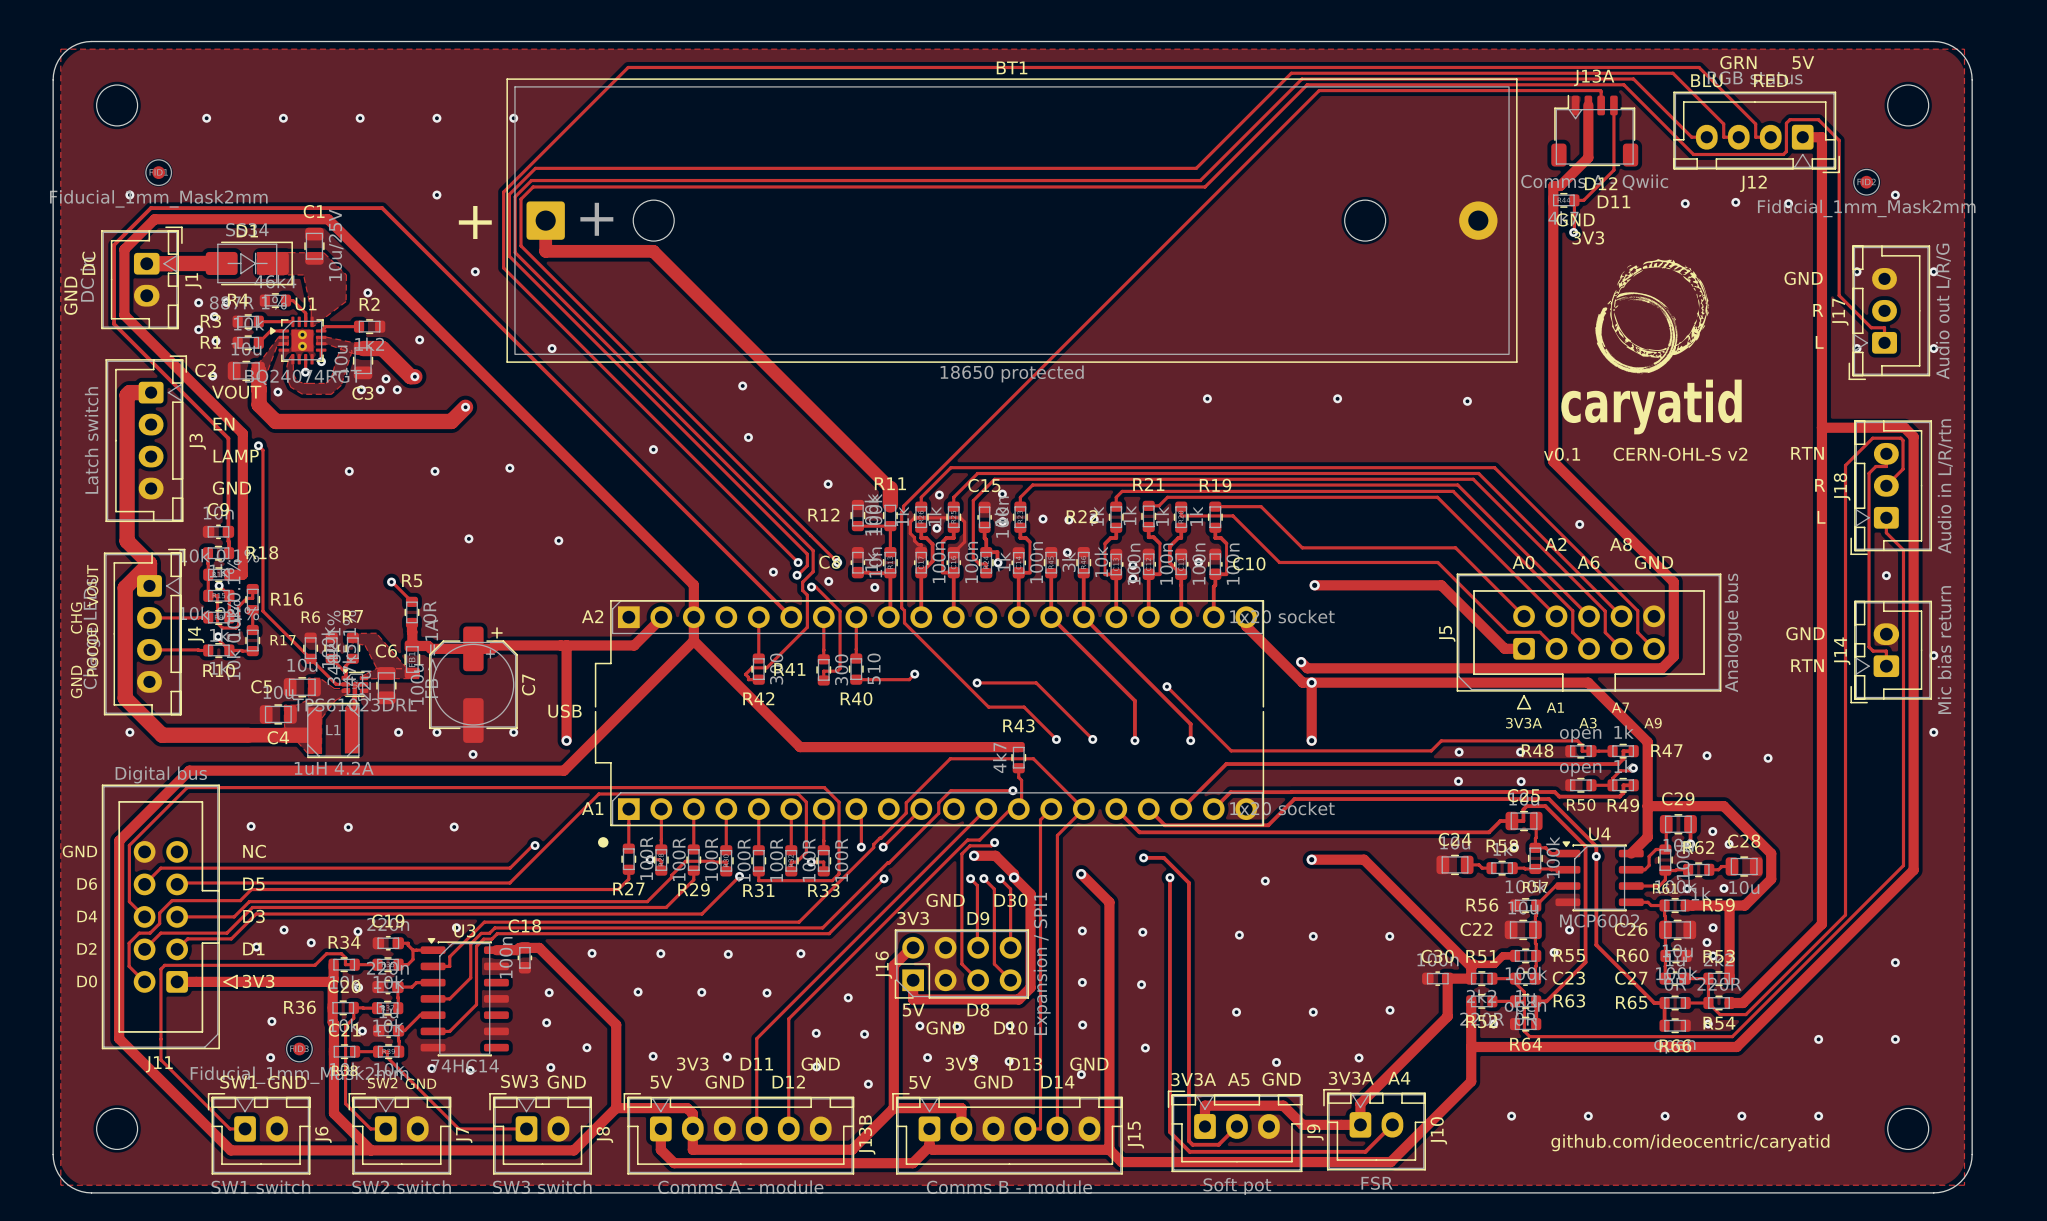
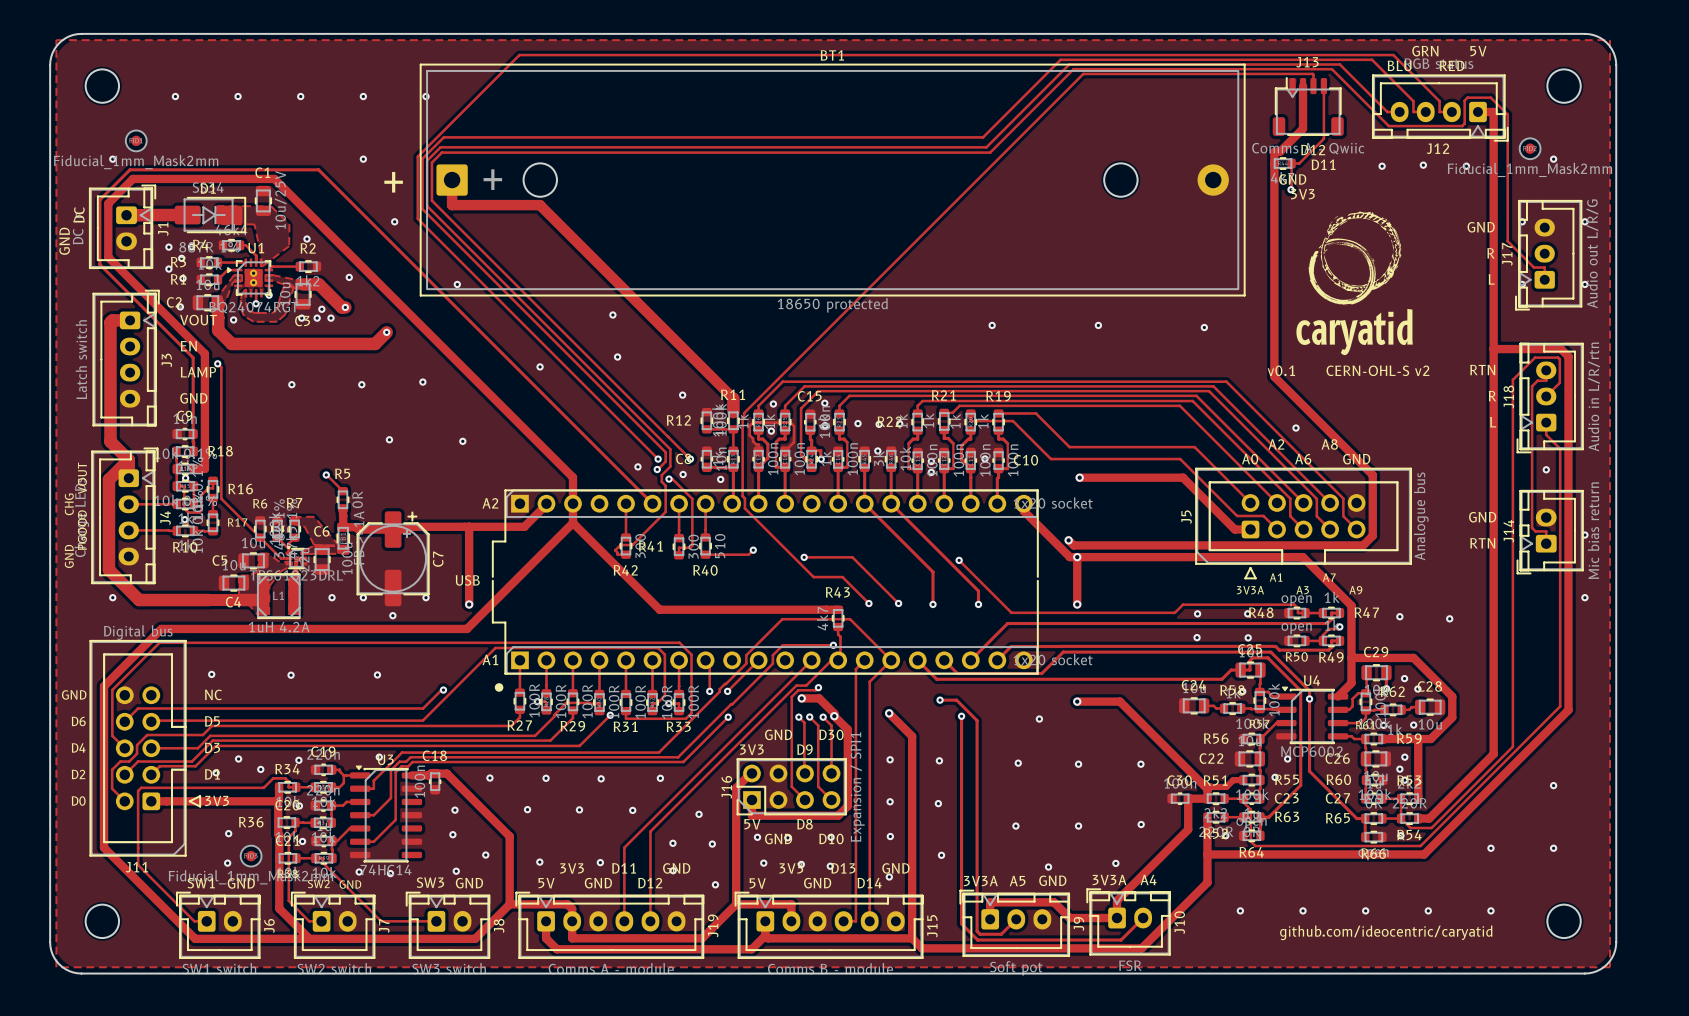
J13A name: J13A (1594, 77) -> J13 (1307, 62)
J13B name: J13B (867, 1134) -> J19 (713, 925)

